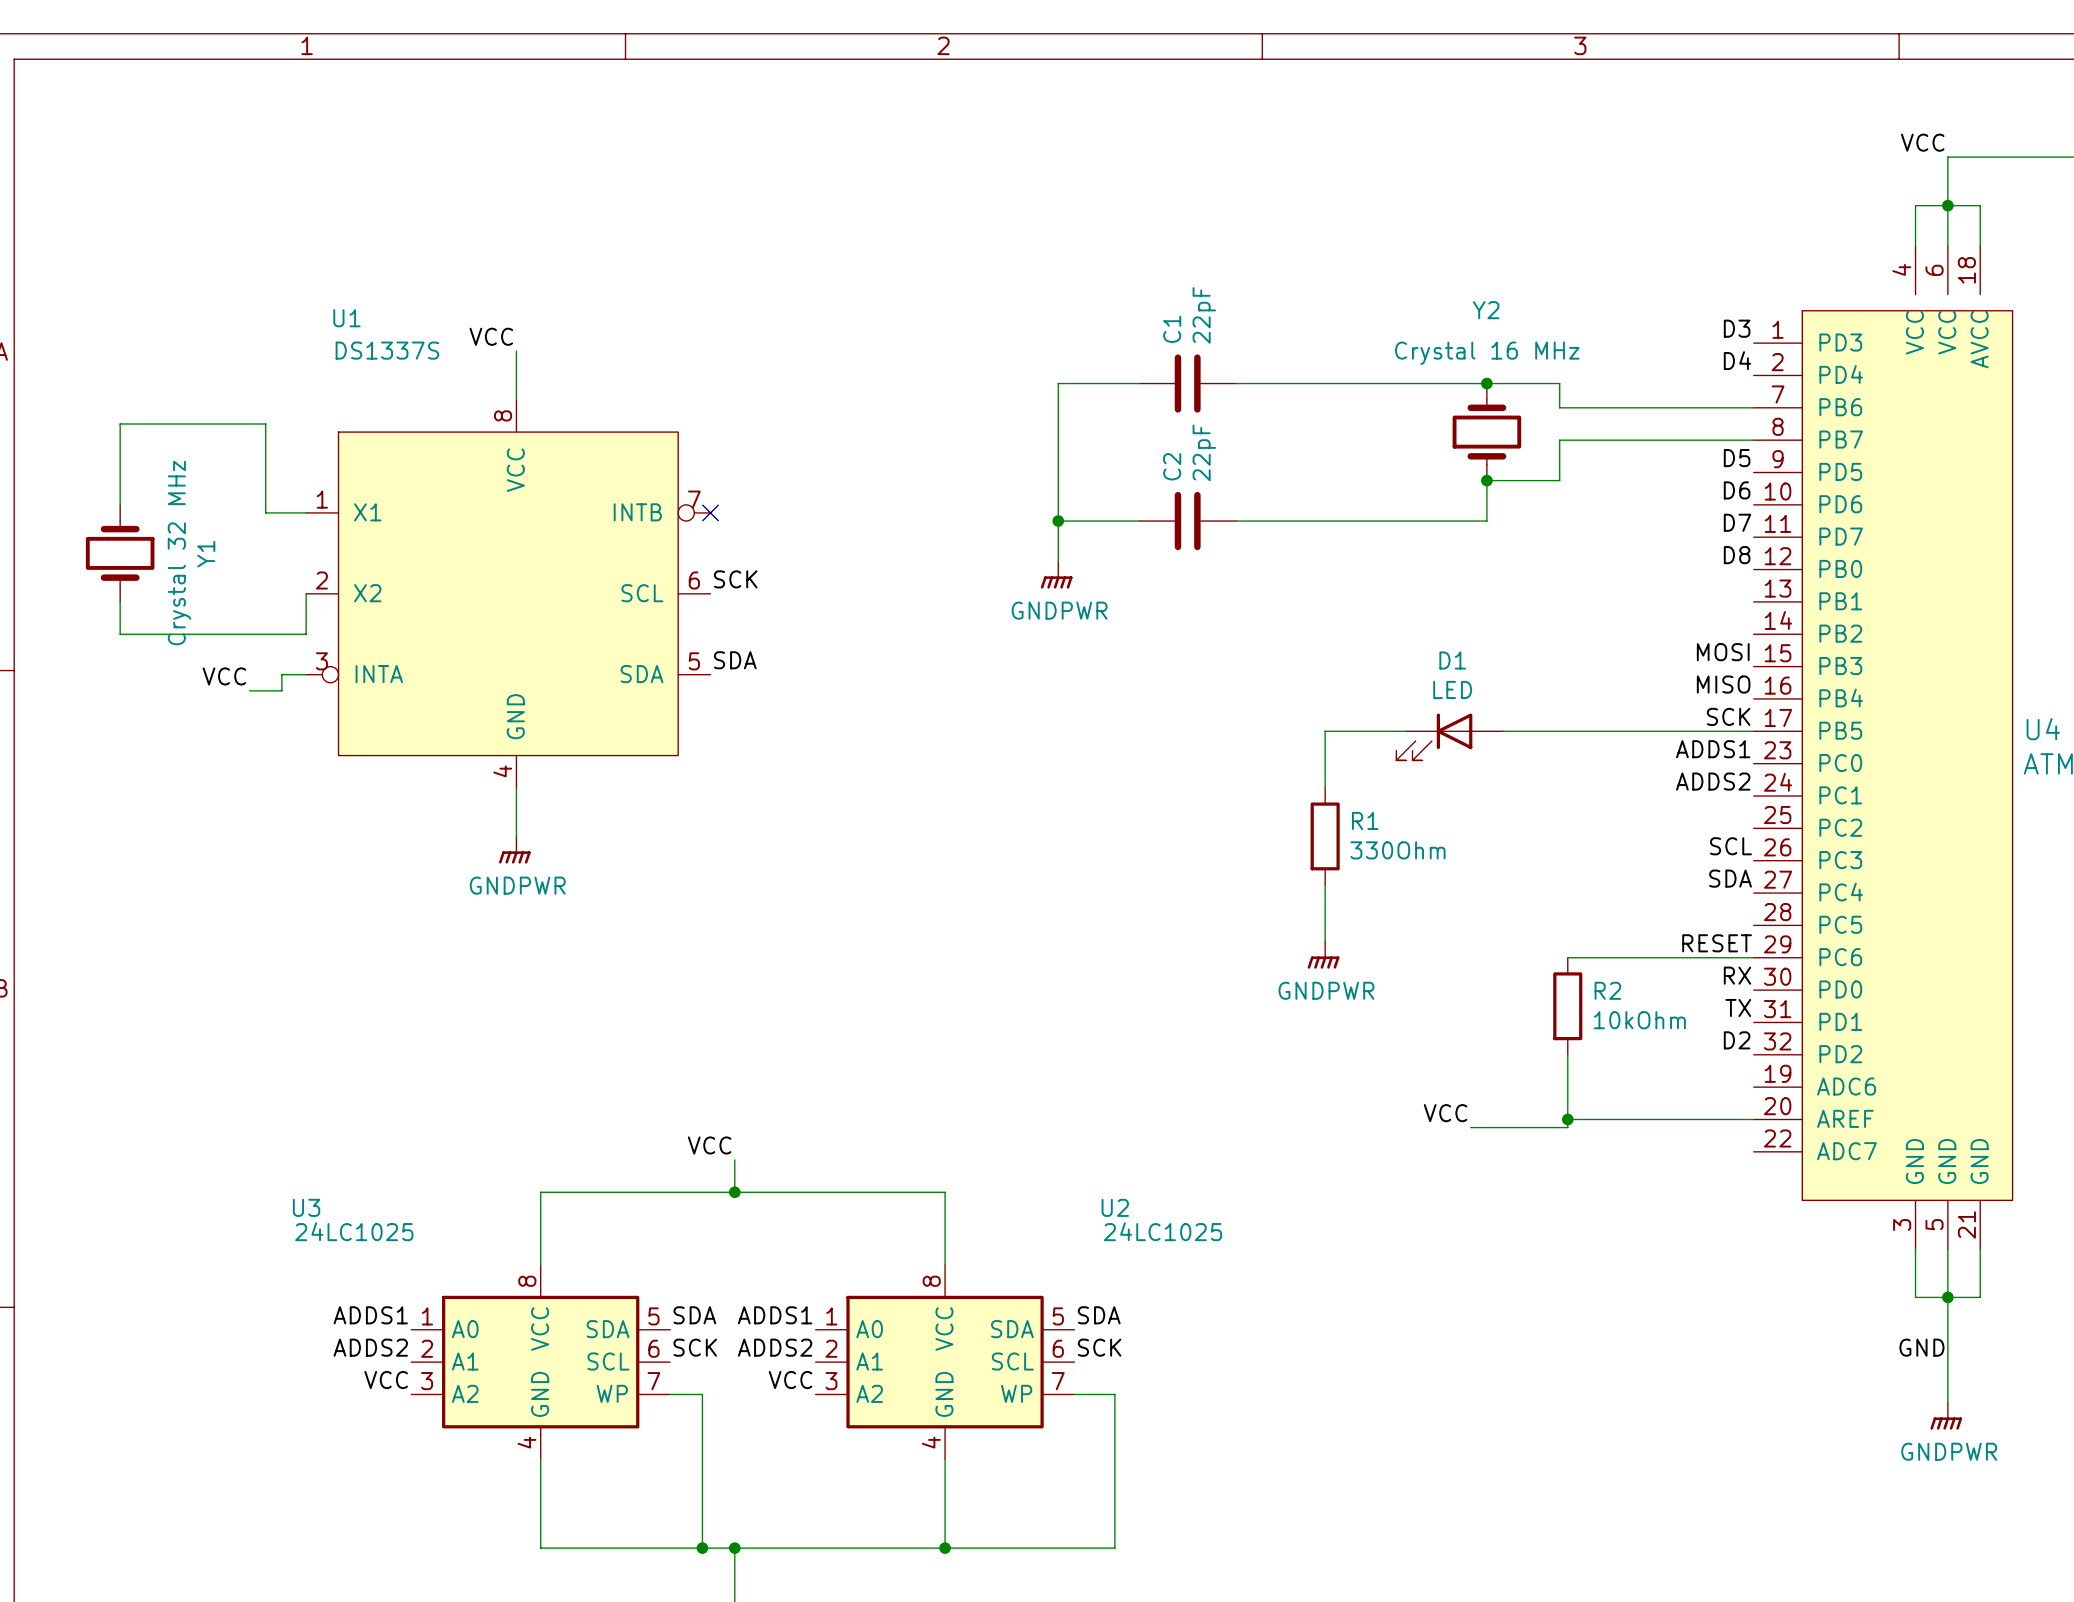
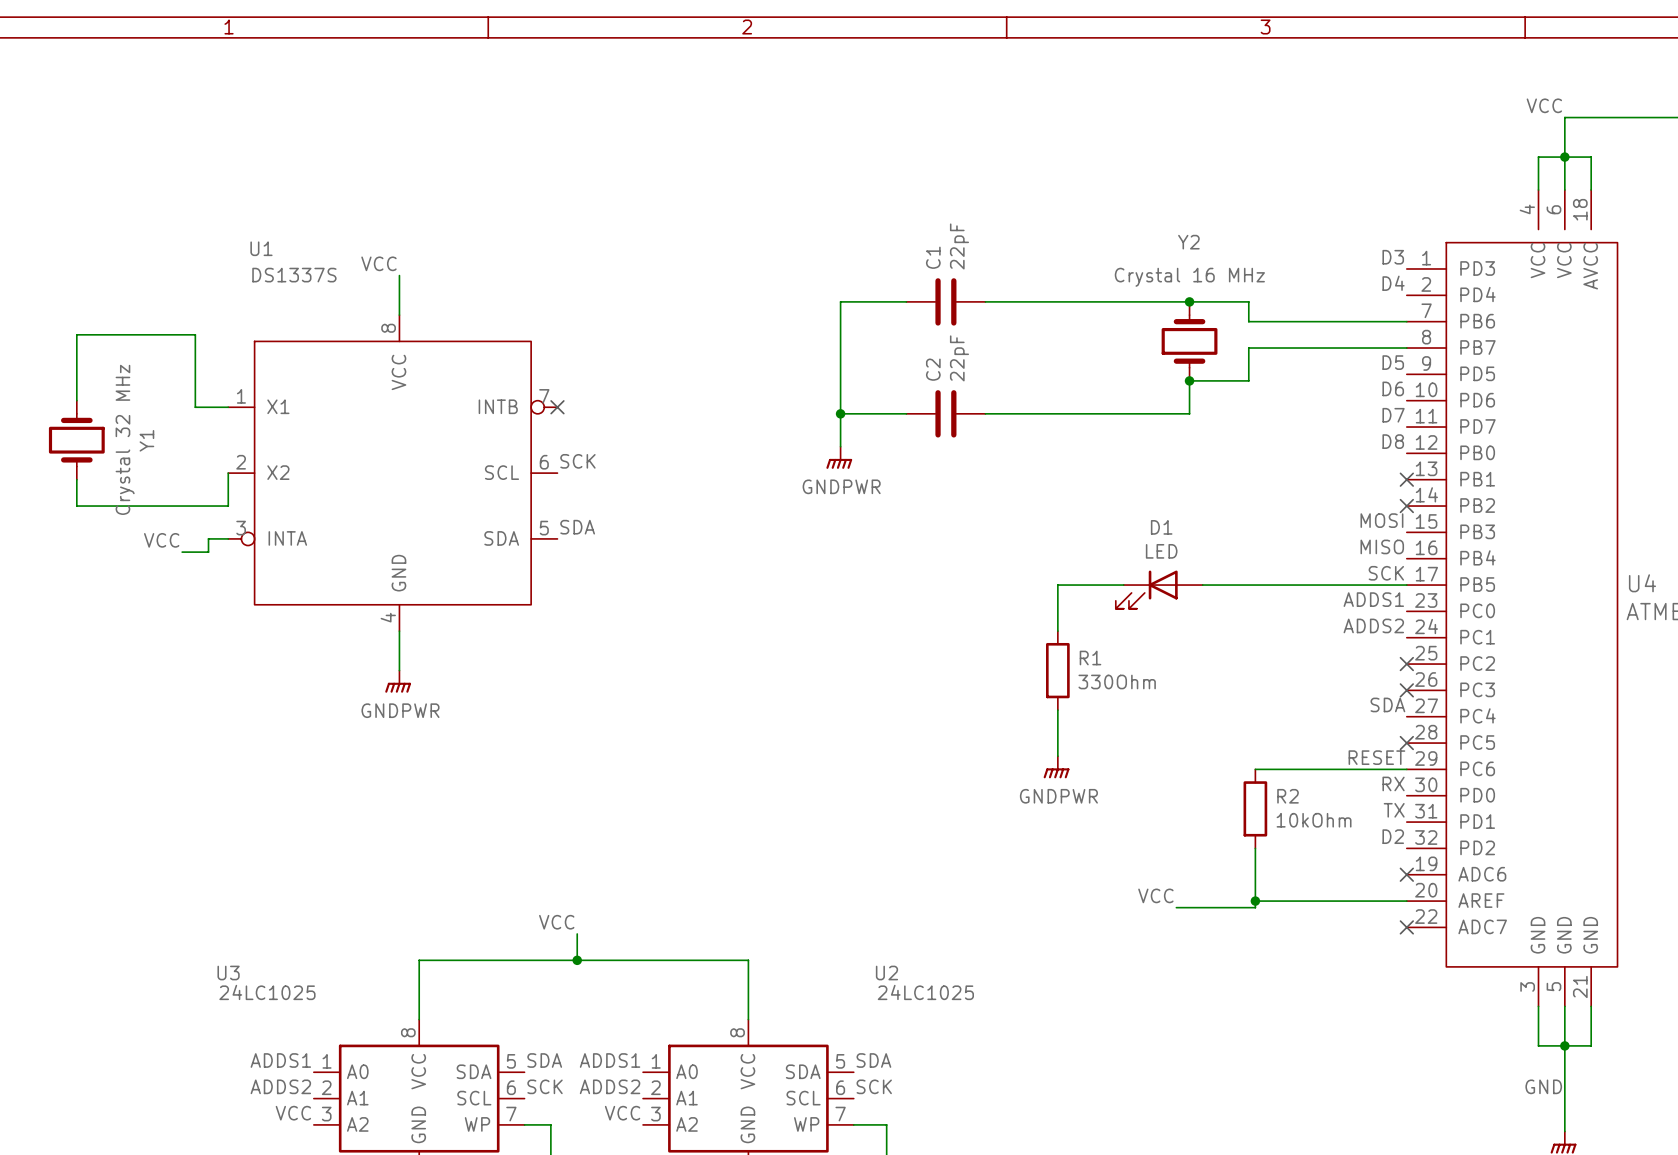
no-connect mark: none -> (1406, 479)
no-connect mark: none -> (1406, 506)
no-connect mark: none -> (1406, 664)
label: SCL (1730, 846) -> none
no-connect mark: none -> (1406, 690)
no-connect mark: none -> (1406, 743)
no-connect mark: none -> (1406, 874)
no-connect mark: none -> (1406, 927)

